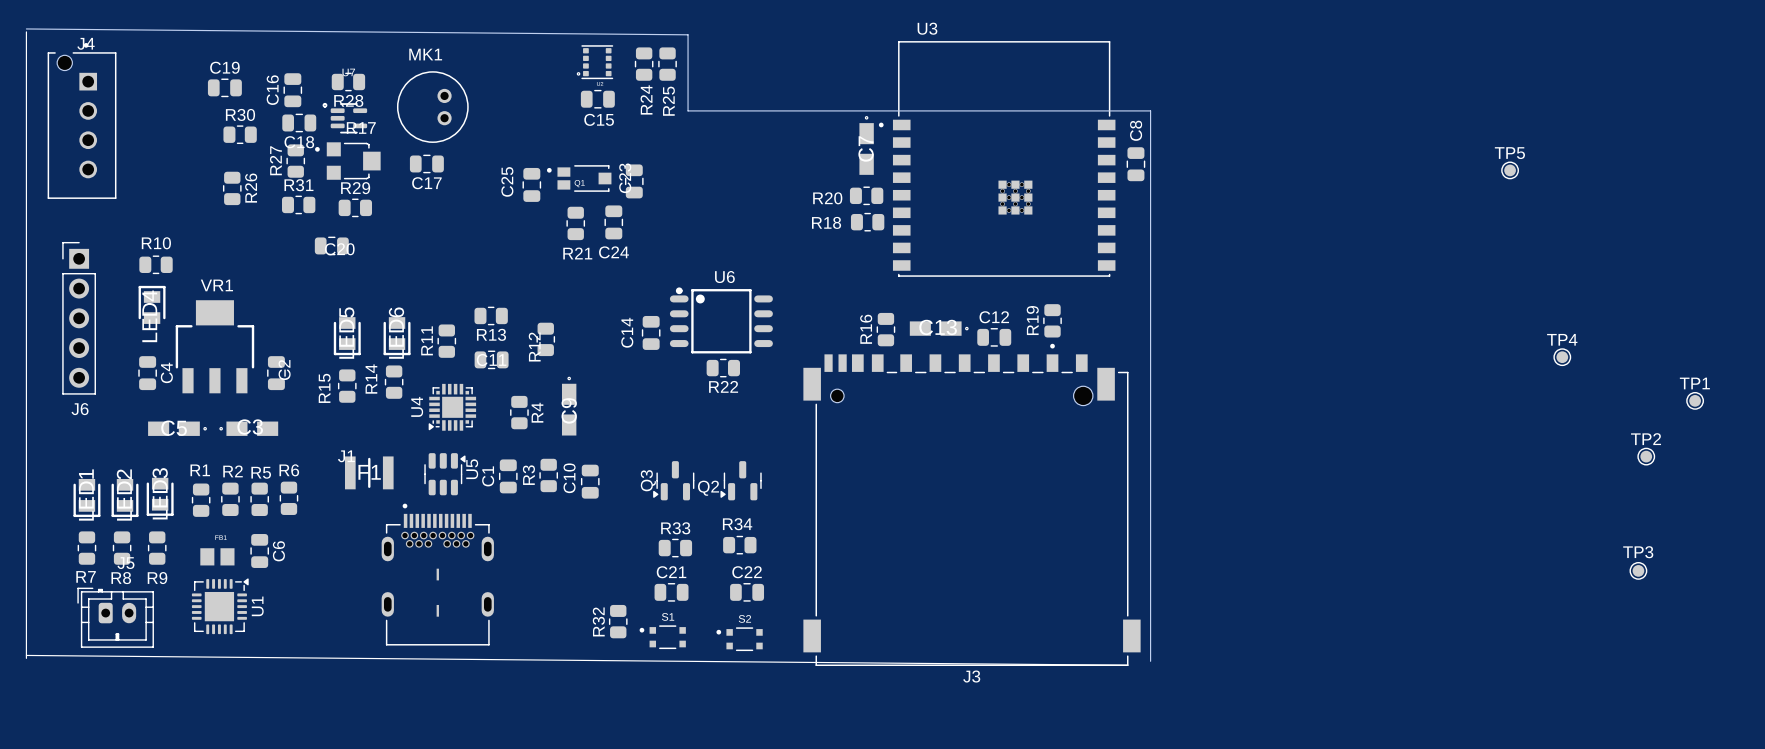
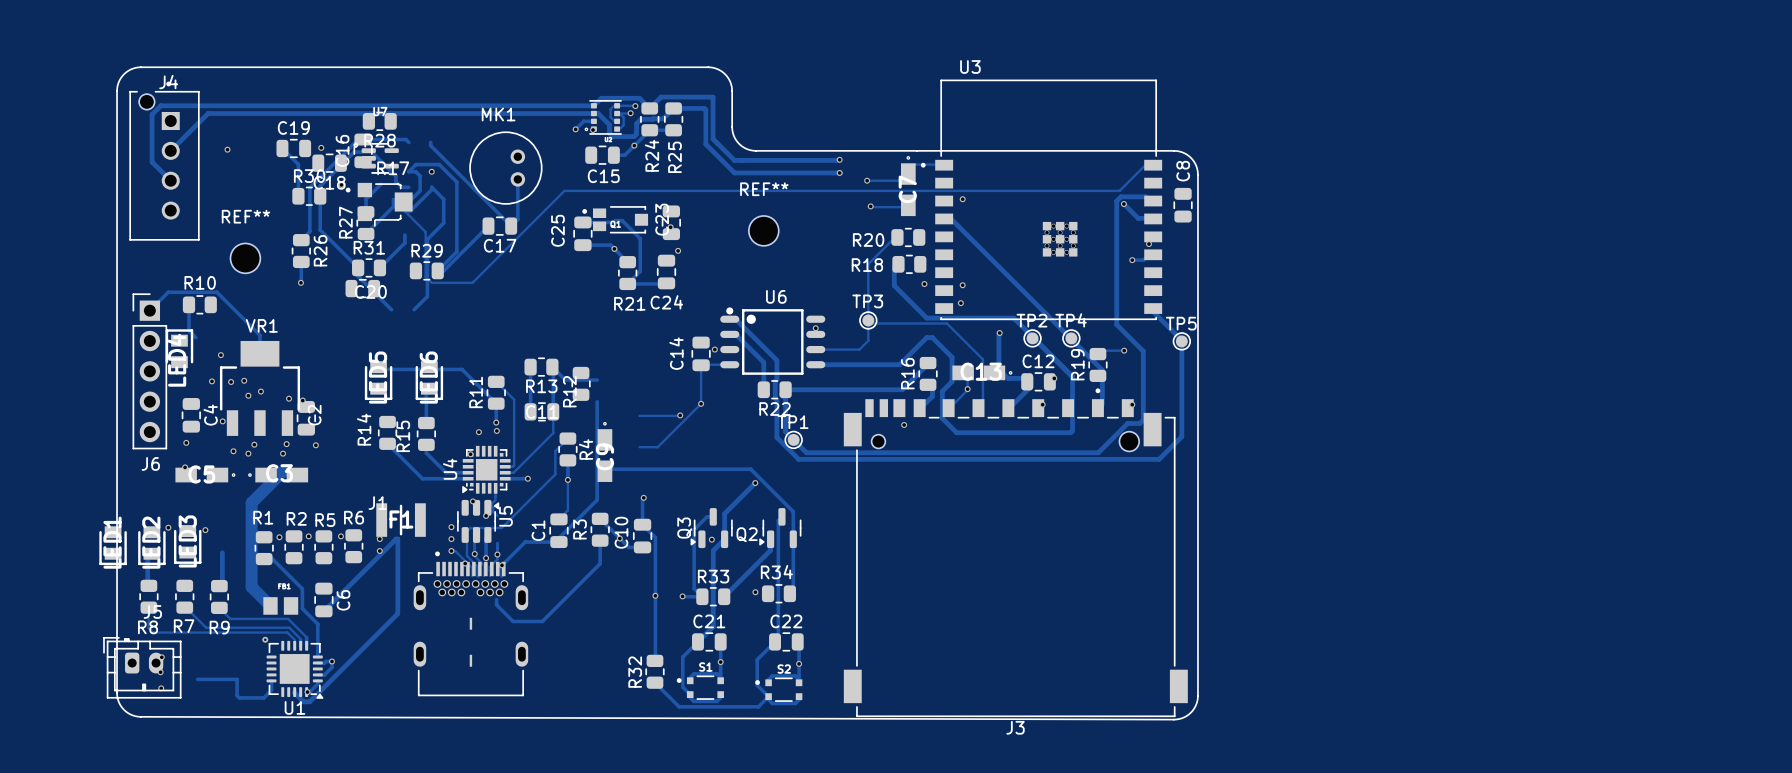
board edge: (26, 28) (688, 34) (688, 110) (1150, 110) (1150, 661) -> none
line: none -> (140, 67) (710, 67) (720, 70) (729, 80) (732, 88) (733, 134) (739, 143) (750, 150) (1174, 150) (1186, 154) (1195, 164) (1197, 174) (1197, 695) (1194, 708) (1186, 715) (1174, 719) (140, 716) (128, 713) (119, 703) (117, 692) (117, 91) (118, 83) (124, 74) (133, 68) (140, 67)
line: (26, 31) (26, 658) -> none
part position: (595, 62) -> (603, 117)
R24 position: (644, 64) -> (649, 119)
R25 position: (667, 64) -> (673, 119)
track: none -> (635, 106) (614, 105) (610, 109) (610, 117) (617, 121)
via: none -> (635, 106)
track: none -> (619, 113) (623, 117) (623, 125) (617, 129)
track: none -> (630, 113) (617, 113)
via: none -> (630, 113)
track: none -> (593, 121) (583, 121) (575, 129)
C19 position: (224, 87) -> (293, 148)
via: none -> (575, 129)
C16 position: (292, 90) -> (363, 150)
via: none -> (593, 129)
track: none -> (673, 130) (649, 130) (624, 155) (613, 155)
C15 position: (597, 99) -> (602, 155)
track: none -> (408, 142) (405, 139) (358, 139) (309, 187) (309, 231) (301, 240)
track: none -> (430, 142) (430, 145) (511, 226) (517, 219) (517, 179)
via: none -> (634, 145)
MK1 position: (432, 107) -> (505, 168)
track: none -> (282, 148) (298, 164) (298, 196)
via: none -> (321, 147)
via: none -> (227, 149)
track: none -> (170, 150) (208, 113) (598, 113) (609, 124) (609, 133) (612, 136) (634, 136) (636, 134) (636, 123) (641, 119) (663, 118) (673, 108) (704, 108) (705, 109) (705, 144) (734, 172) (840, 172)
track: none -> (839, 159) (734, 160) (713, 138) (713, 97) (661, 97) (649, 108) (639, 98) (601, 98) (593, 105) (160, 105) (152, 114) (152, 162) (170, 180)
via: none -> (839, 159)
J4 position: (82, 120) -> (164, 161)
track: none -> (940, 164) (915, 164) (899, 180) (867, 180)
track: none -> (1149, 164) (1145, 164) (1119, 190) (564, 190) (472, 282) (431, 282) (425, 276) (425, 231) (404, 211) (410, 211) (431, 189) (431, 187) (443, 199) (443, 223) (427, 239) (427, 296) (414, 309)
via: none -> (431, 171)
via: none -> (839, 172)
R30 position: (240, 134) -> (309, 196)
via: none -> (867, 180)
track: none -> (380, 184) (366, 199) (366, 212)
via: none -> (341, 184)
track: none -> (408, 187) (401, 187) (395, 181) (395, 176) (371, 152) (354, 152) (320, 186) (320, 230) (358, 267) (358, 276) (391, 309)
via: none -> (962, 199)
track: none -> (1153, 200) (1149, 200) (1145, 196) (1120, 196) (1116, 201) (1116, 324) (1143, 351) (1143, 420) (1139, 423) (1127, 423) (1098, 452) (806, 452) (785, 431) (785, 389)
R27 position: (295, 161) -> (366, 223)
C17 position: (426, 163) -> (499, 226)
track: none -> (1123, 204) (1138, 218) (1149, 218)
via: none -> (1123, 204)
track: none -> (870, 206) (904, 207)
via: none -> (870, 206)
TP5 position: (1510, 170) -> (1181, 341)
track: none -> (940, 218) (950, 218) (1102, 370) (1102, 404)
track: none -> (582, 222) (622, 220) (640, 238) (640, 271) (627, 283) (666, 283)
track: none -> (488, 226) (443, 270) (437, 270) (456, 251) (456, 182) (439, 164) (415, 164) (408, 171) (415, 171) (420, 176) (420, 190) (411, 199) (393, 199) (393, 206) (366, 234)
C25 position: (531, 184) -> (582, 233)
via: none -> (670, 227)
R26 position: (232, 188) -> (301, 251)
REF**: none -> (763, 230)
track: none -> (404, 235) (404, 242) (379, 267)
track: none -> (893, 239) (868, 264) (868, 340) (859, 349) (815, 349)
via: none -> (1149, 244)
track: none -> (582, 245) (610, 245) (627, 262)
R31 position: (298, 204) -> (369, 267)
R29 position: (355, 207) -> (426, 270)
via: none -> (614, 248)
via: none -> (678, 250)
track: none -> (1149, 254) (1143, 260) (1132, 260)
REF**: none -> (245, 258)
via: none -> (1132, 260)
track: none -> (301, 261) (300, 282)
C24 position: (613, 222) -> (666, 272)
R21 position: (575, 223) -> (627, 273)
track: none -> (894, 266) (894, 285) (926, 318) (1013, 318) (1072, 376) (1072, 430) (1070, 432) (956, 432) (942, 418) (942, 391) (952, 381) (952, 357) (932, 337) (926, 337) (899, 364) (815, 364)
via: none -> (300, 282)
via: none -> (924, 284)
via: none -> (962, 285)
via: none -> (960, 303)
track: none -> (188, 304) (188, 330) (195, 337)
R10 position: (156, 264) -> (199, 304)
track: none -> (1149, 307) (1183, 342)
track: none -> (149, 310) (168, 292) (216, 292) (259, 335) (259, 353)
track: none -> (729, 319) (735, 319) (776, 360) (776, 379) (775, 381) (776, 437) (798, 459) (1159, 459) (1181, 436) (1181, 341) (1178, 344)
track: none -> (868, 320) (871, 323) (946, 323) (982, 359) (982, 404)
via: none -> (815, 328)
track: none -> (999, 333) (998, 369) (1007, 378) (1031, 378) (1031, 385) (1012, 404)
via: none -> (999, 333)
track: none -> (729, 334) (735, 334) (763, 362) (763, 389)
via: none -> (714, 349)
track: none -> (1102, 350) (1124, 350)
via: none -> (1124, 350)
via: none -> (220, 355)
R13 position: (491, 315) -> (541, 367)
track: none -> (932, 359) (902, 389) (785, 389)
J6 position: (79, 318) -> (149, 371)
track: none -> (729, 364) (701, 364) (701, 403) (657, 447) (639, 447)
U6 position: (721, 320) -> (772, 341)
track: none -> (530, 367) (530, 411)
track: none -> (552, 367) (565, 380) (597, 380)
track: none -> (553, 367) (553, 433) (513, 472) (505, 472)
track: none -> (384, 369) (462, 369) (496, 403) (495, 423)
track: none -> (967, 369) (967, 390) (953, 404)
C14 position: (651, 332) -> (701, 353)
via: none -> (1054, 378)
via: none -> (211, 381)
via: none -> (244, 380)
track: none -> (932, 381) (932, 396) (924, 404)
via: none -> (231, 381)
track: none -> (496, 381) (514, 399) (514, 465) (505, 466)
R11 position: (446, 341) -> (496, 392)
via: none -> (967, 389)
VR1 position: (214, 346) -> (259, 388)
via: none -> (260, 391)
track: none -> (423, 390) (426, 393) (426, 423)
via: none -> (248, 395)
via: none -> (289, 398)
via: none -> (302, 400)
track: none -> (597, 401) (597, 500) (558, 538) (558, 542) (525, 542) (501, 565) (501, 576)
TP4 position: (1562, 357) -> (1071, 338)
via: none -> (701, 403)
part position: (491, 359) -> (541, 411)
via: none -> (1042, 404)
via: none -> (1132, 404)
track: none -> (680, 413) (679, 415) (639, 415)
R22 position: (723, 368) -> (774, 389)
via: none -> (680, 415)
C4 position: (147, 373) -> (191, 415)
via: none -> (222, 421)
via: none -> (496, 422)
via: none -> (904, 424)
R14 position: (394, 382) -> (387, 432)
via: none -> (496, 430)
R15 position: (347, 386) -> (426, 433)
via: none -> (478, 432)
track: none -> (567, 438) (555, 451) (555, 474) (501, 528) (470, 528) (466, 531) (466, 556) (478, 567) (478, 576)
via: none -> (186, 442)
via: none -> (254, 444)
via: none -> (286, 444)
track: none -> (387, 443) (422, 478) (468, 478)
via: none -> (315, 445)
track: none -> (426, 444) (426, 453) (446, 472) (468, 472)
TP1 position: (1695, 400) -> (793, 439)
via: none -> (233, 451)
via: none -> (248, 453)
via: none -> (283, 453)
U4 position: (452, 407) -> (486, 469)
via: none -> (470, 454)
R4 position: (519, 412) -> (567, 449)
via: none -> (185, 467)
track: none -> (605, 469) (750, 469) (793, 511) (793, 590) (789, 593)
track: none -> (282, 472) (251, 502) (251, 587) (270, 605)
track: none -> (505, 478) (527, 478)
via: none -> (527, 478)
track: none -> (567, 479) (567, 460) (567, 510) (558, 519)
via: none -> (567, 479)
track: none -> (755, 483) (724, 513) (724, 539) (713, 550) (713, 626) (682, 657) (682, 687) (693, 701) (716, 701) (720, 694)
via: none -> (755, 483)
track: none -> (495, 488) (495, 500) (490, 504) (497, 515)
track: none -> (643, 497) (642, 524) (655, 537) (654, 660)
via: none -> (643, 497)
via: none -> (472, 501)
TP2 position: (1646, 456) -> (1032, 338)
via: none -> (486, 515)
track: none -> (713, 516) (707, 516) (694, 529) (694, 588) (702, 596) (682, 596)
track: none -> (781, 516) (778, 520) (778, 638) (757, 659) (757, 685) (768, 696)
track: none -> (600, 518) (628, 547) (642, 547)
R3 position: (548, 475) -> (600, 529)
C1 position: (508, 476) -> (558, 530)
via: none -> (451, 527)
via: none -> (168, 527)
C10 position: (590, 481) -> (642, 536)
via: none -> (205, 530)
via: none -> (308, 536)
via: none -> (340, 536)
via: none -> (279, 537)
track: none -> (486, 538) (486, 558)
via: none -> (619, 538)
via: none -> (379, 539)
via: none -> (451, 539)
track: none -> (770, 539) (770, 550) (724, 596)
via: none -> (711, 539)
track: none -> (600, 540) (600, 563) (542, 621) (513, 621) (496, 604) (496, 599)
track: none -> (474, 543) (474, 556) (484, 565) (484, 576)
track: none -> (497, 543) (497, 559) (489, 567) (490, 576)
R6 position: (288, 498) -> (353, 546)
R2 position: (230, 499) -> (294, 547)
R5 position: (259, 499) -> (323, 547)
R1 position: (201, 500) -> (264, 548)
via: none -> (379, 551)
track: none -> (451, 551) (455, 551) (472, 567) (472, 576)
via: none -> (451, 551)
track: none -> (222, 552) (222, 583) (219, 586)
track: none -> (147, 553) (147, 586)
via: none -> (474, 553)
via: none -> (497, 554)
via: none -> (486, 558)
track: none -> (264, 559) (272, 559) (302, 588) (302, 608) (317, 624) (317, 657)
via: none -> (465, 563)
via: none -> (501, 565)
via: none -> (755, 592)
via: none -> (655, 595)
via: none -> (682, 596)
R7: (86, 548) -> none
R9: none -> (219, 596)
C6 position: (259, 550) -> (323, 599)
part position: (217, 556) -> (280, 605)
track: none -> (219, 607) (230, 618) (288, 618) (306, 637) (306, 645)
track: none -> (148, 609) (148, 628) (153, 633) (287, 632) (294, 639) (294, 649)
track: none -> (187, 609) (206, 627) (289, 627) (300, 639) (300, 645) (300, 639)
track: none -> (323, 611) (397, 539) (397, 613) (309, 701) (303, 701) (294, 692)
TP3 position: (1638, 570) -> (868, 320)
R9 name: R9 (157, 578) -> R7 (184, 626)
via: none -> (265, 639)
track: none -> (720, 641) (720, 680)
track: none -> (797, 641) (799, 682)
U1 rotation: 0° (220, 606) -> 90° clockwise (295, 669)
U1 position: (220, 606) -> (295, 669)
via: none -> (161, 657)
via: none -> (332, 661)
track: none -> (317, 662) (332, 661) (332, 667) (324, 674) (317, 674)
via: none -> (720, 662)
via: none -> (799, 663)
via: none -> (160, 672)
track: none -> (720, 677) (716, 673) (693, 673) (690, 680)
track: none -> (197, 679) (237, 679) (237, 695) (239, 697) (263, 697) (271, 690) (271, 680)
track: none -> (799, 679) (795, 675) (772, 675) (768, 682)
track: none -> (317, 680) (317, 684) (309, 692) (306, 692)
track: none -> (654, 682) (679, 706) (758, 706) (768, 696)
via: none -> (161, 688)
via: none -> (307, 692)
track: none -> (768, 696) (772, 703) (795, 703) (799, 696)
line: (26, 655) (1127, 665) -> none

